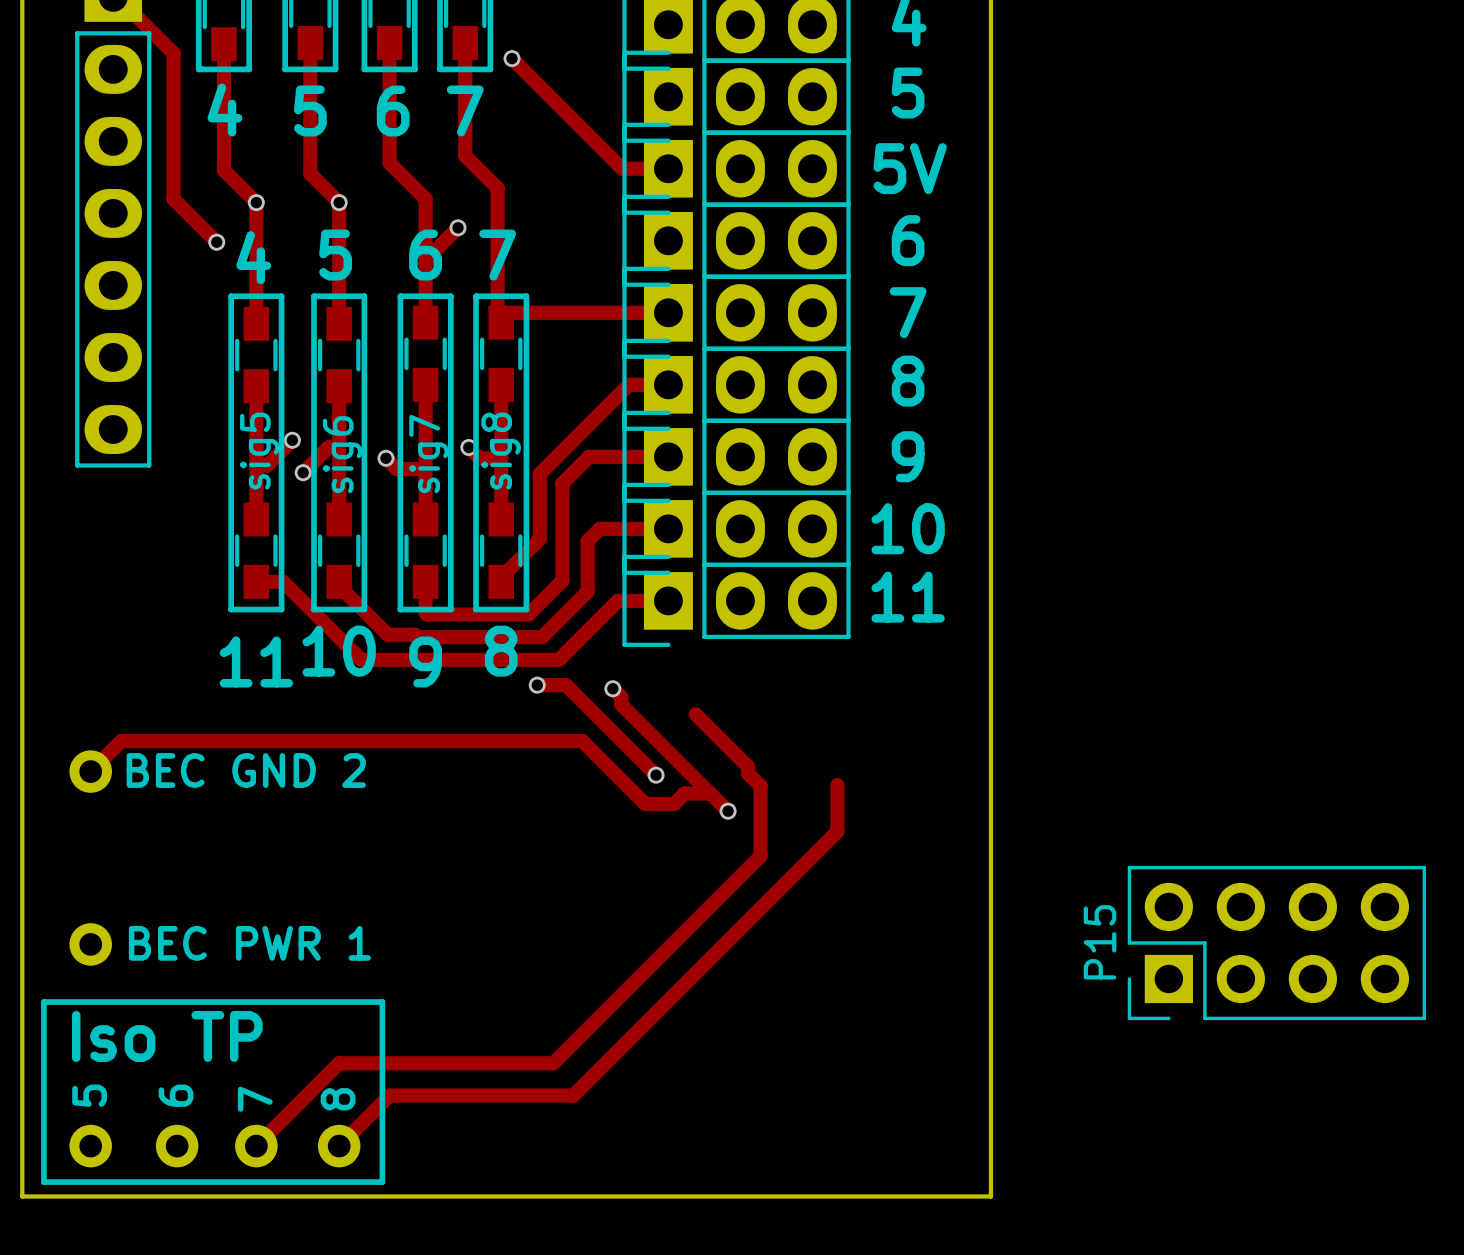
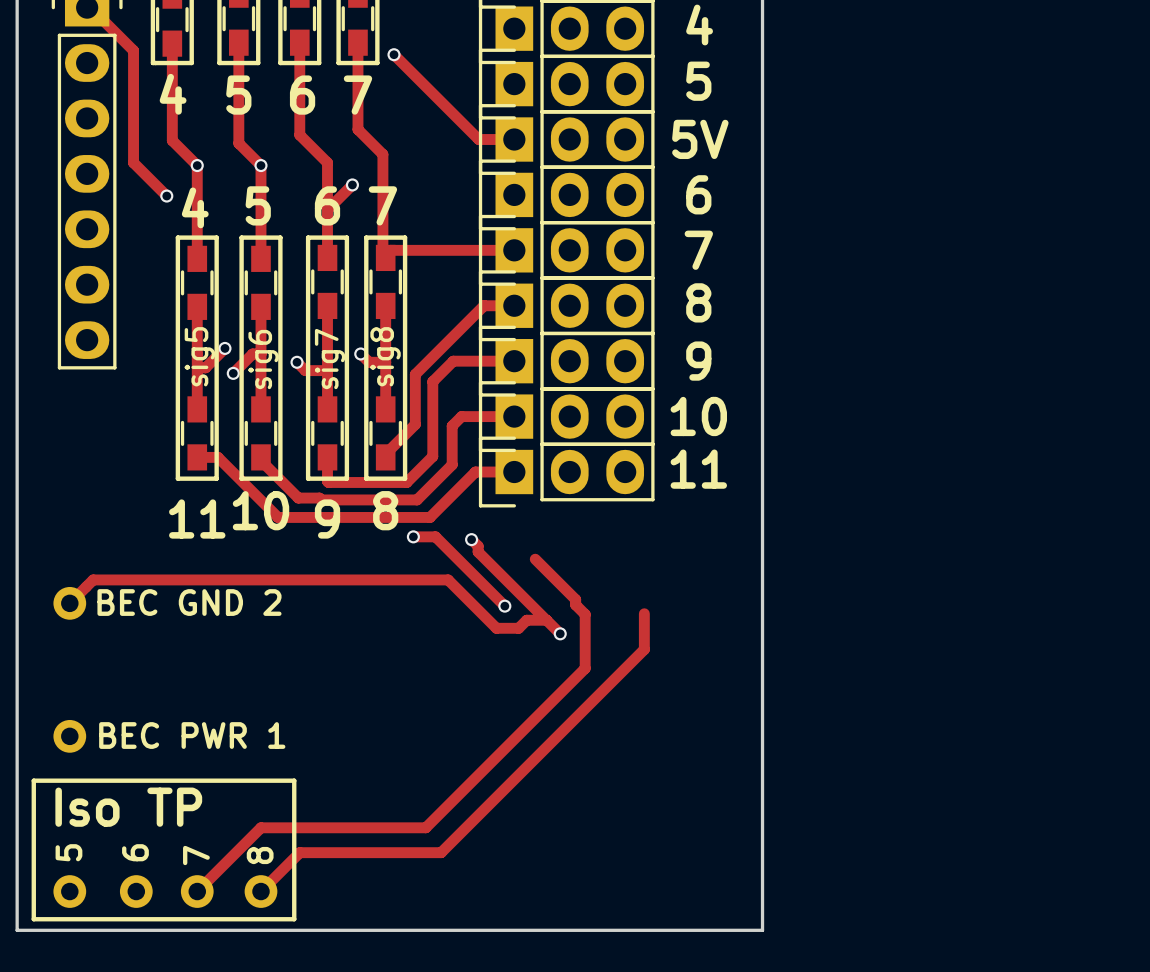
P15: (1276, 942) -> none

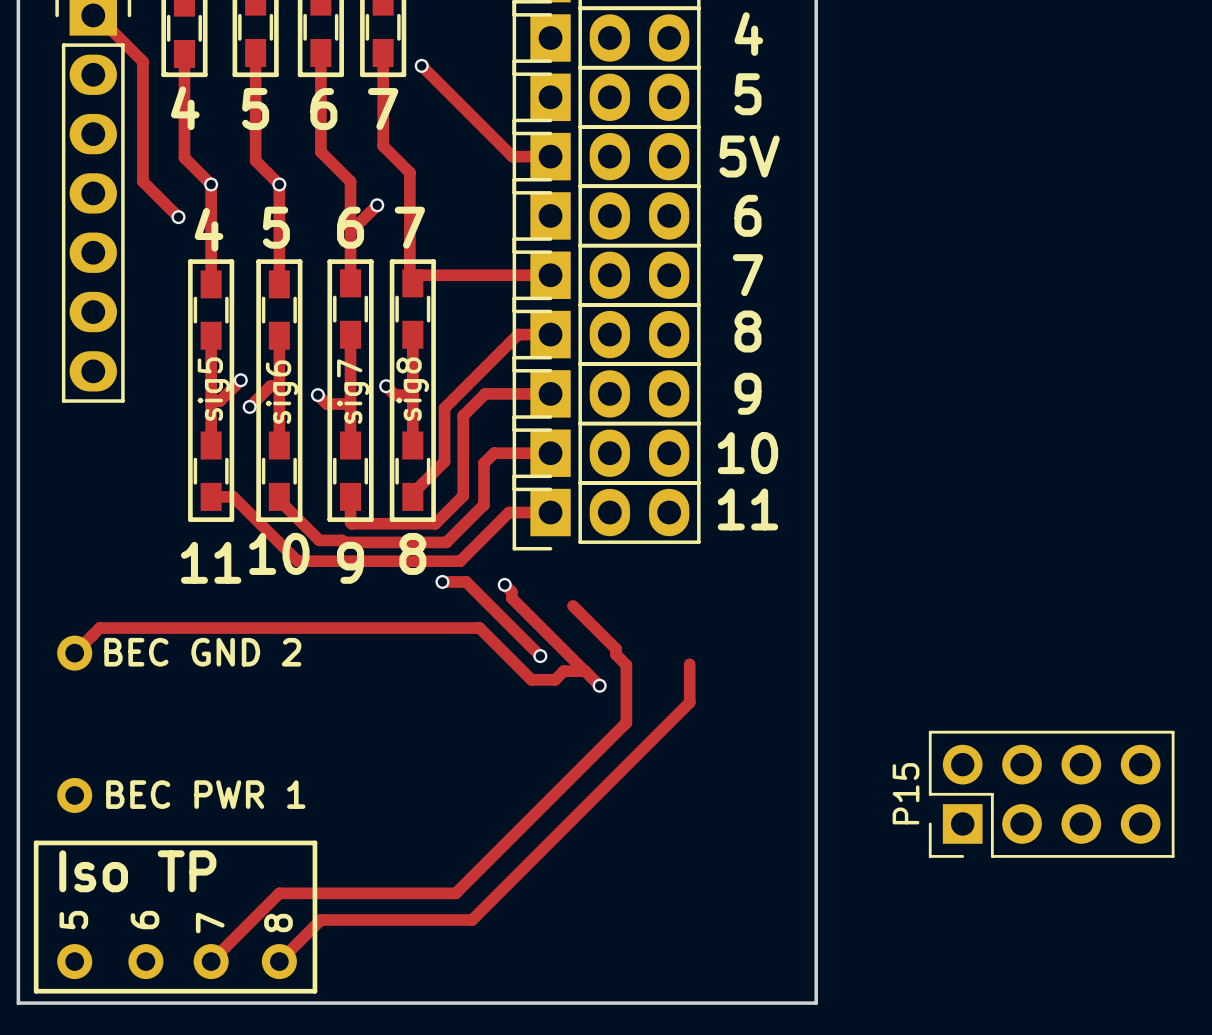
P15: none -> (1051, 794)

